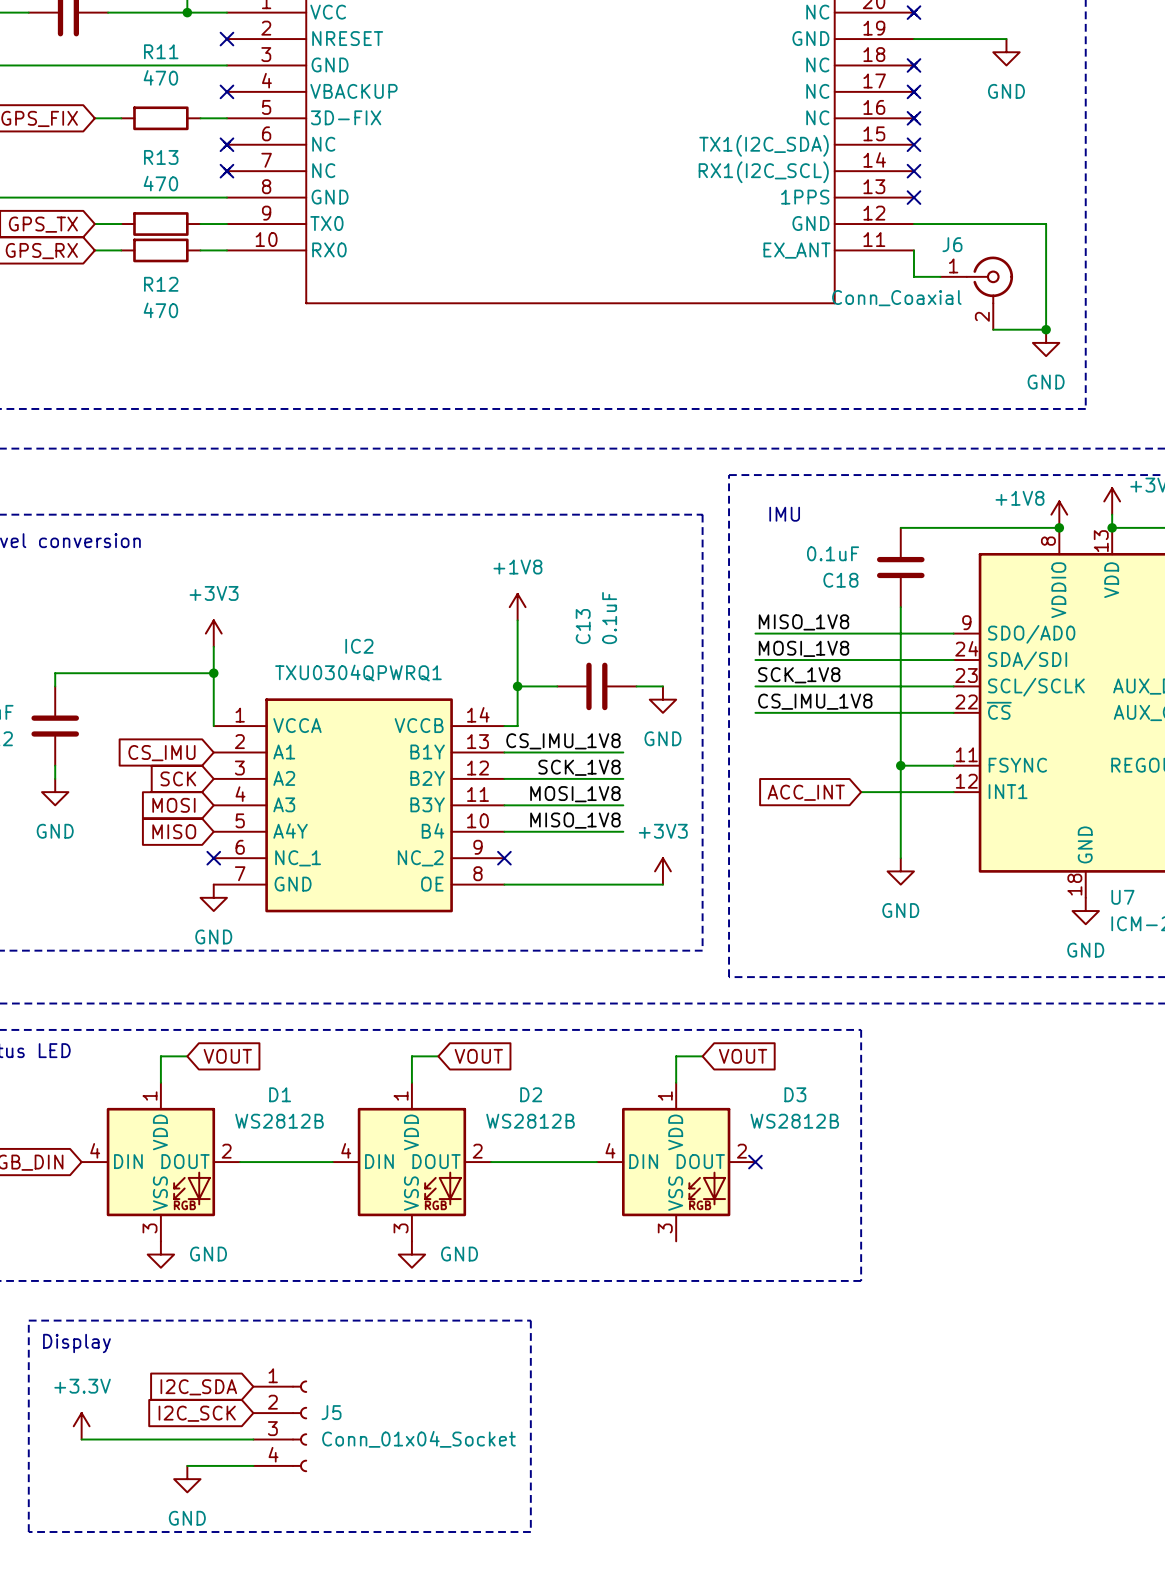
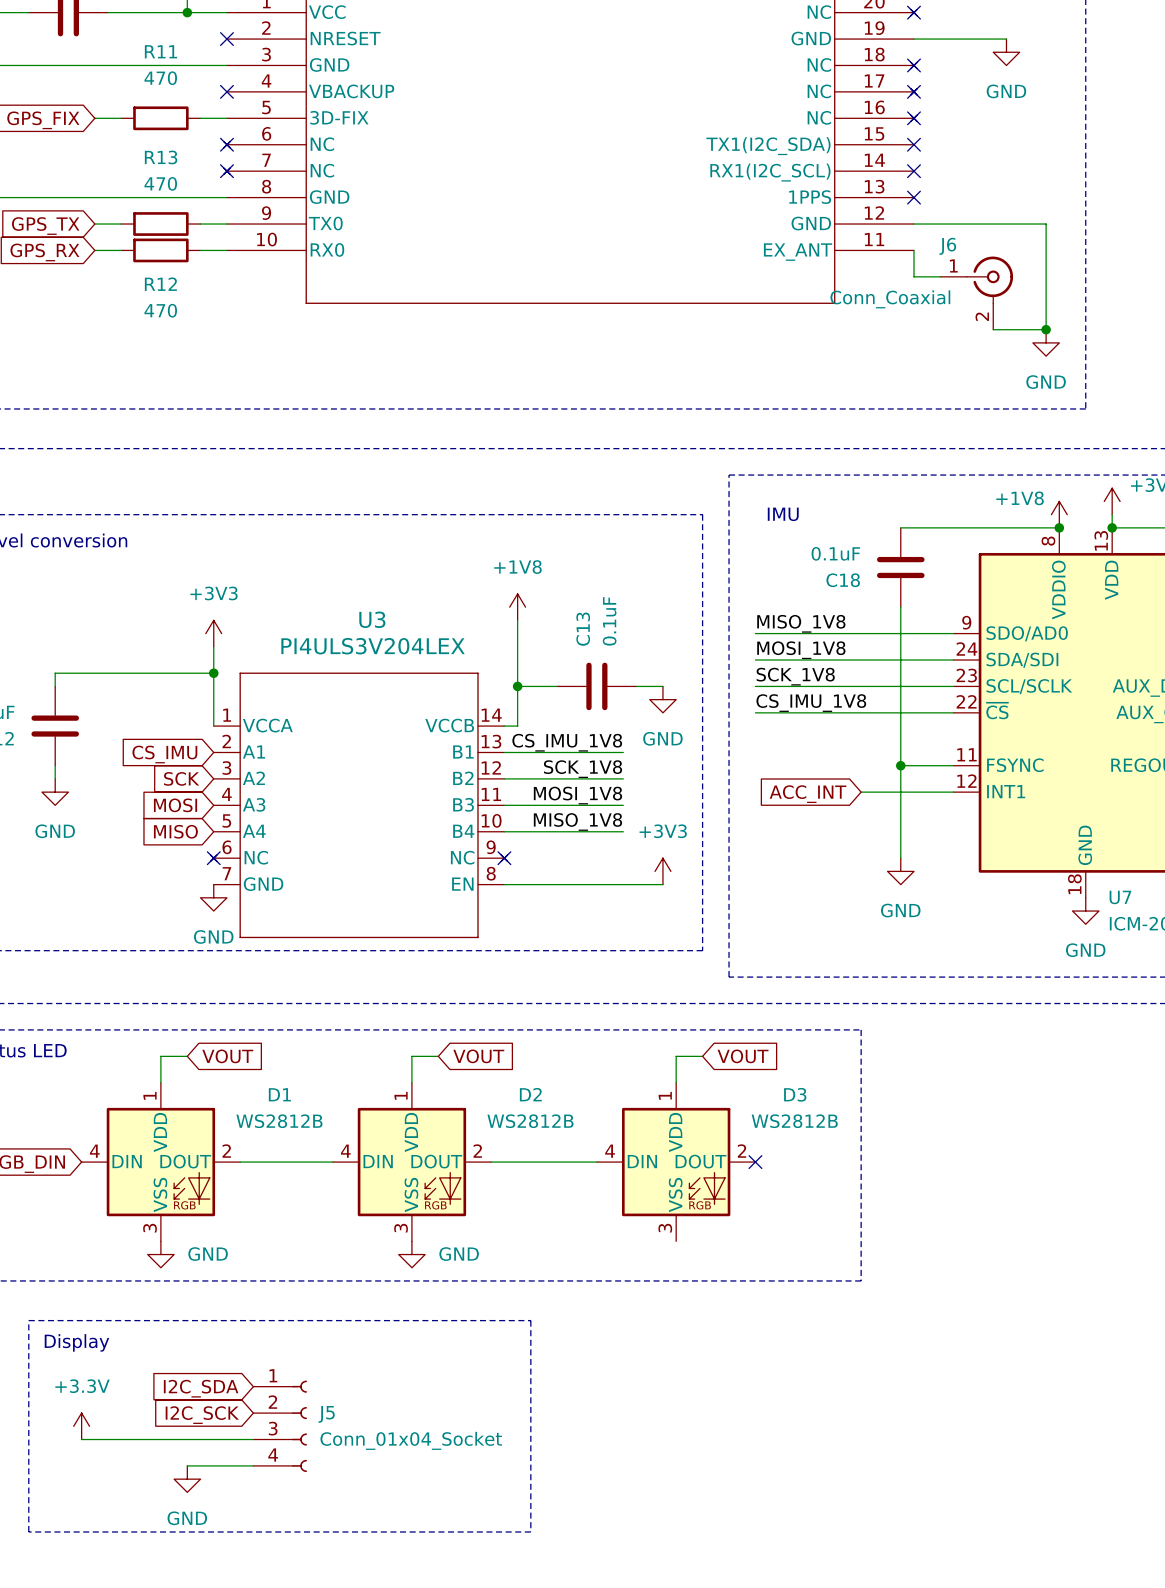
IC2: TXU0304QPWRQ1 (359, 805) -> none
U3: none -> PI4ULS3V204LEX (359, 805)

